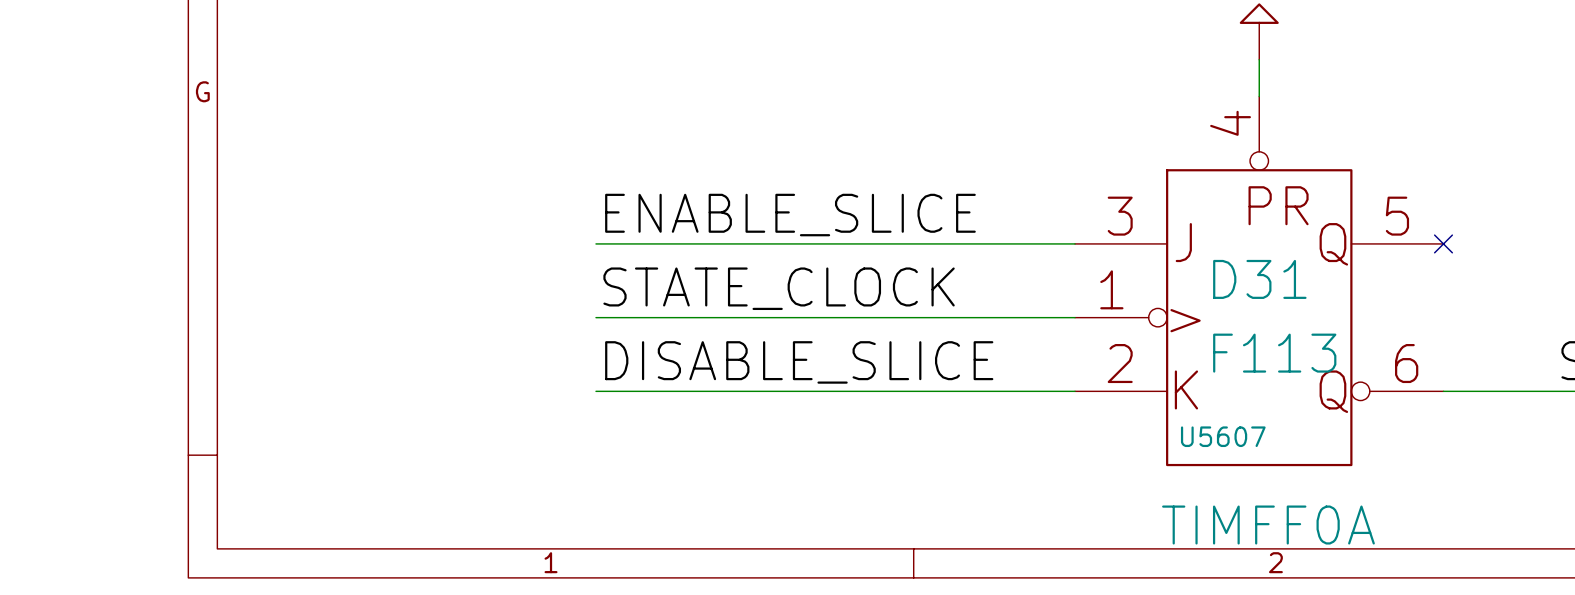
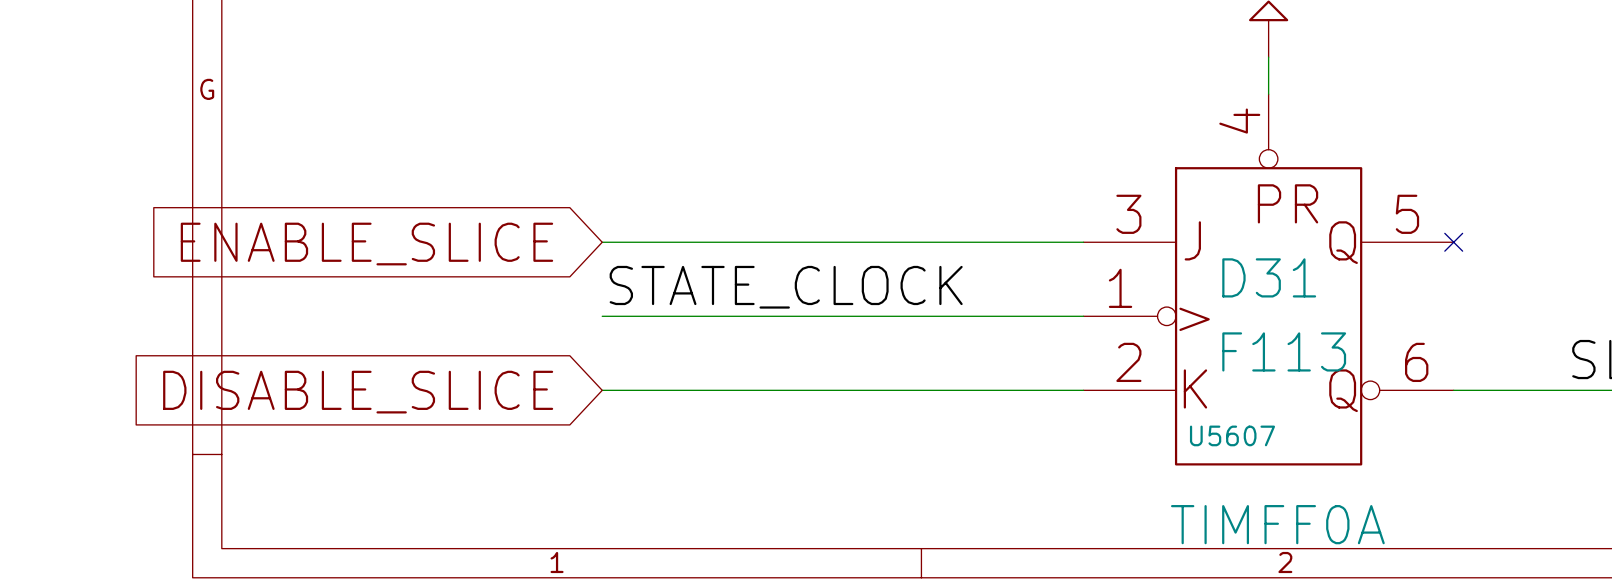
label: ENABLE_SLICE (790, 215) -> none
global label: none -> ENABLE_SLICE (366, 244)
label: DISABLE_SLICE (799, 362) -> none
global label: none -> DISABLE_SLICE (358, 392)

